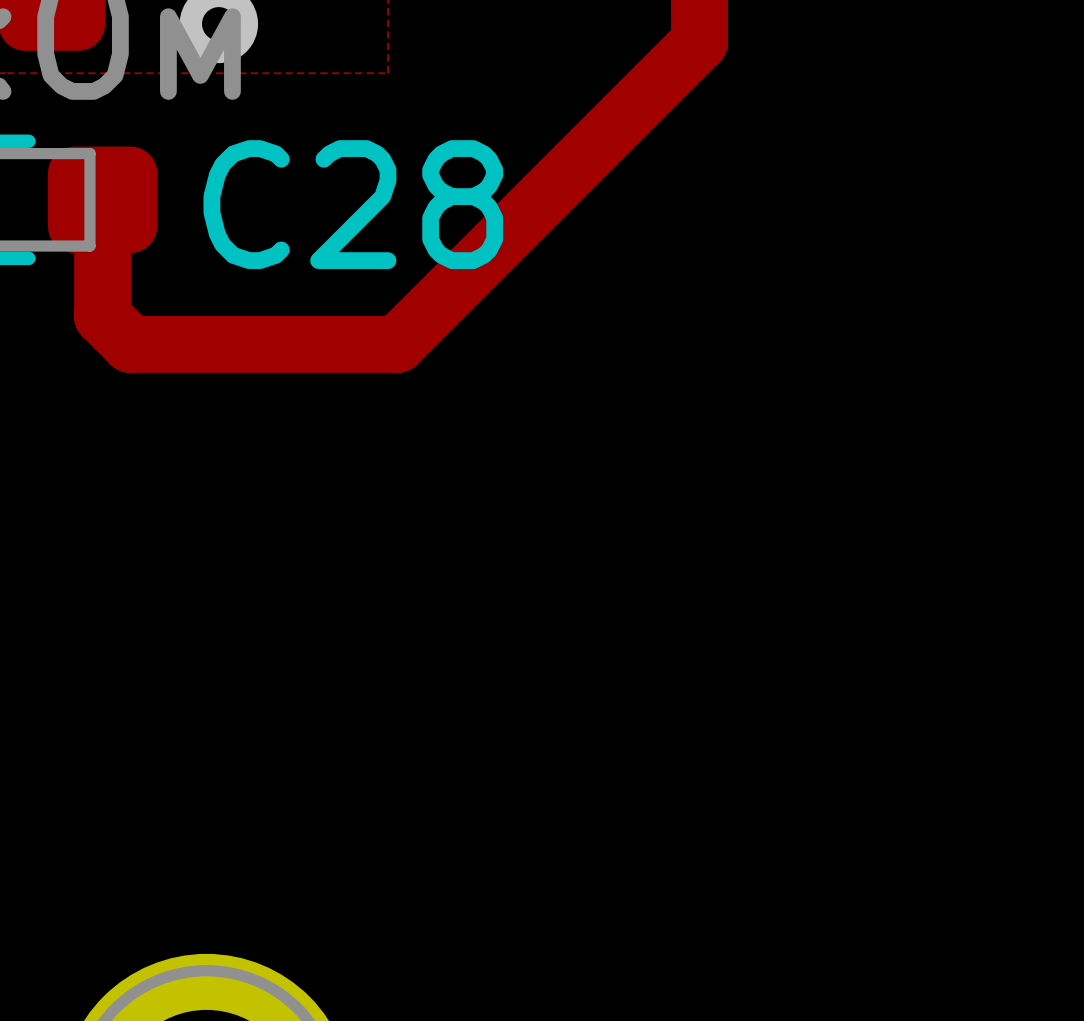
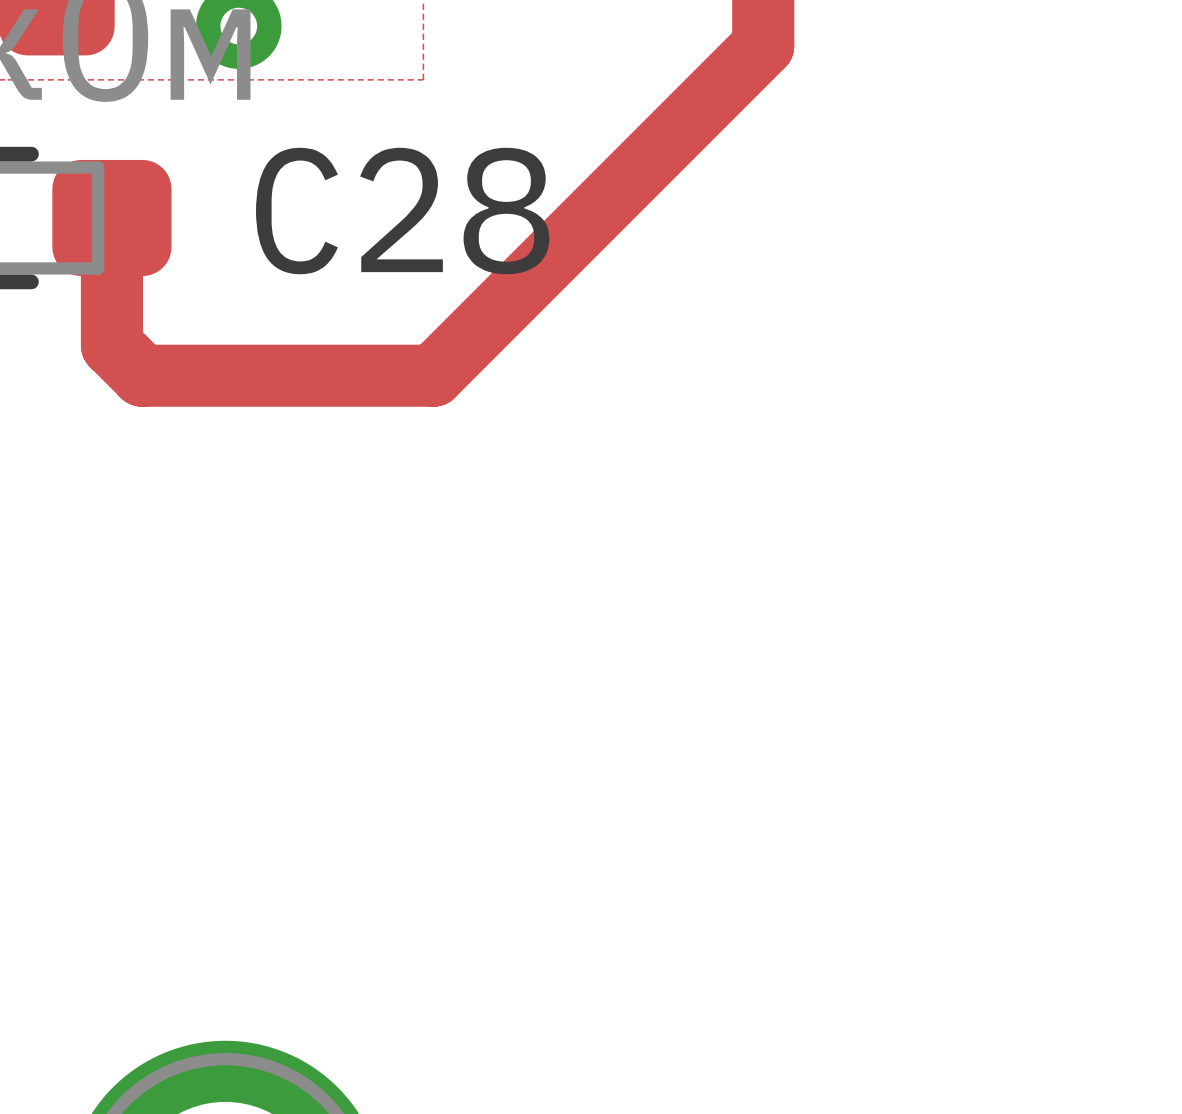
C28 name position: C28 (353, 204) -> C28 (402, 211)

